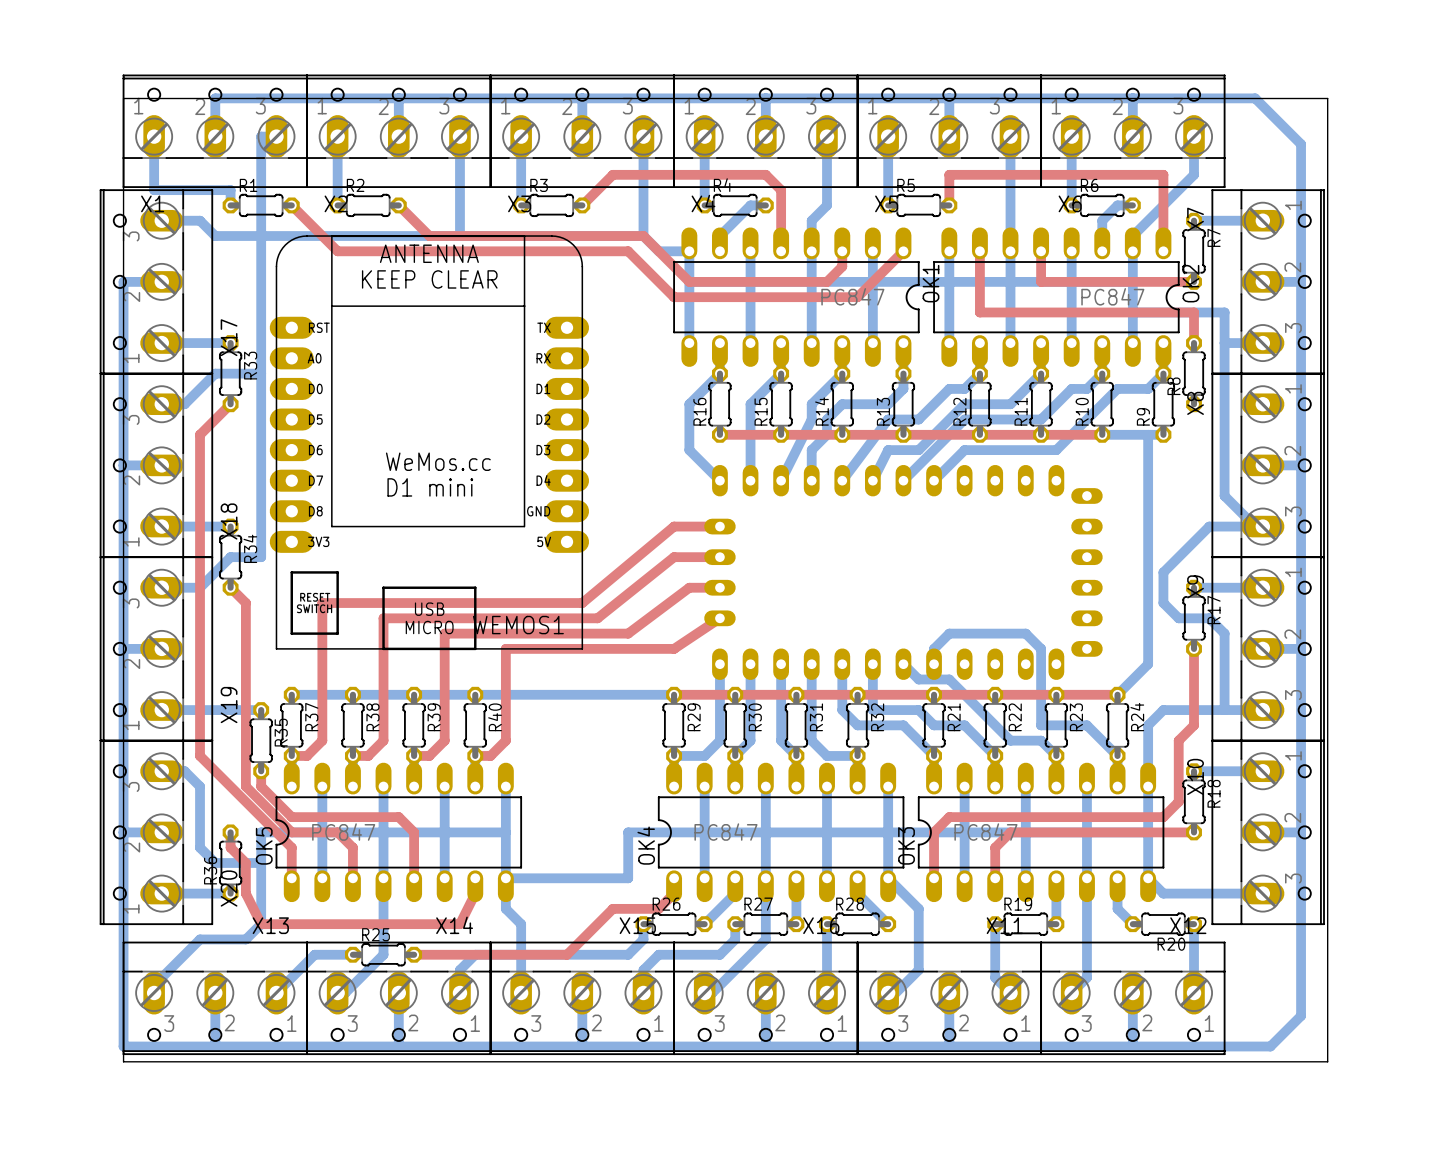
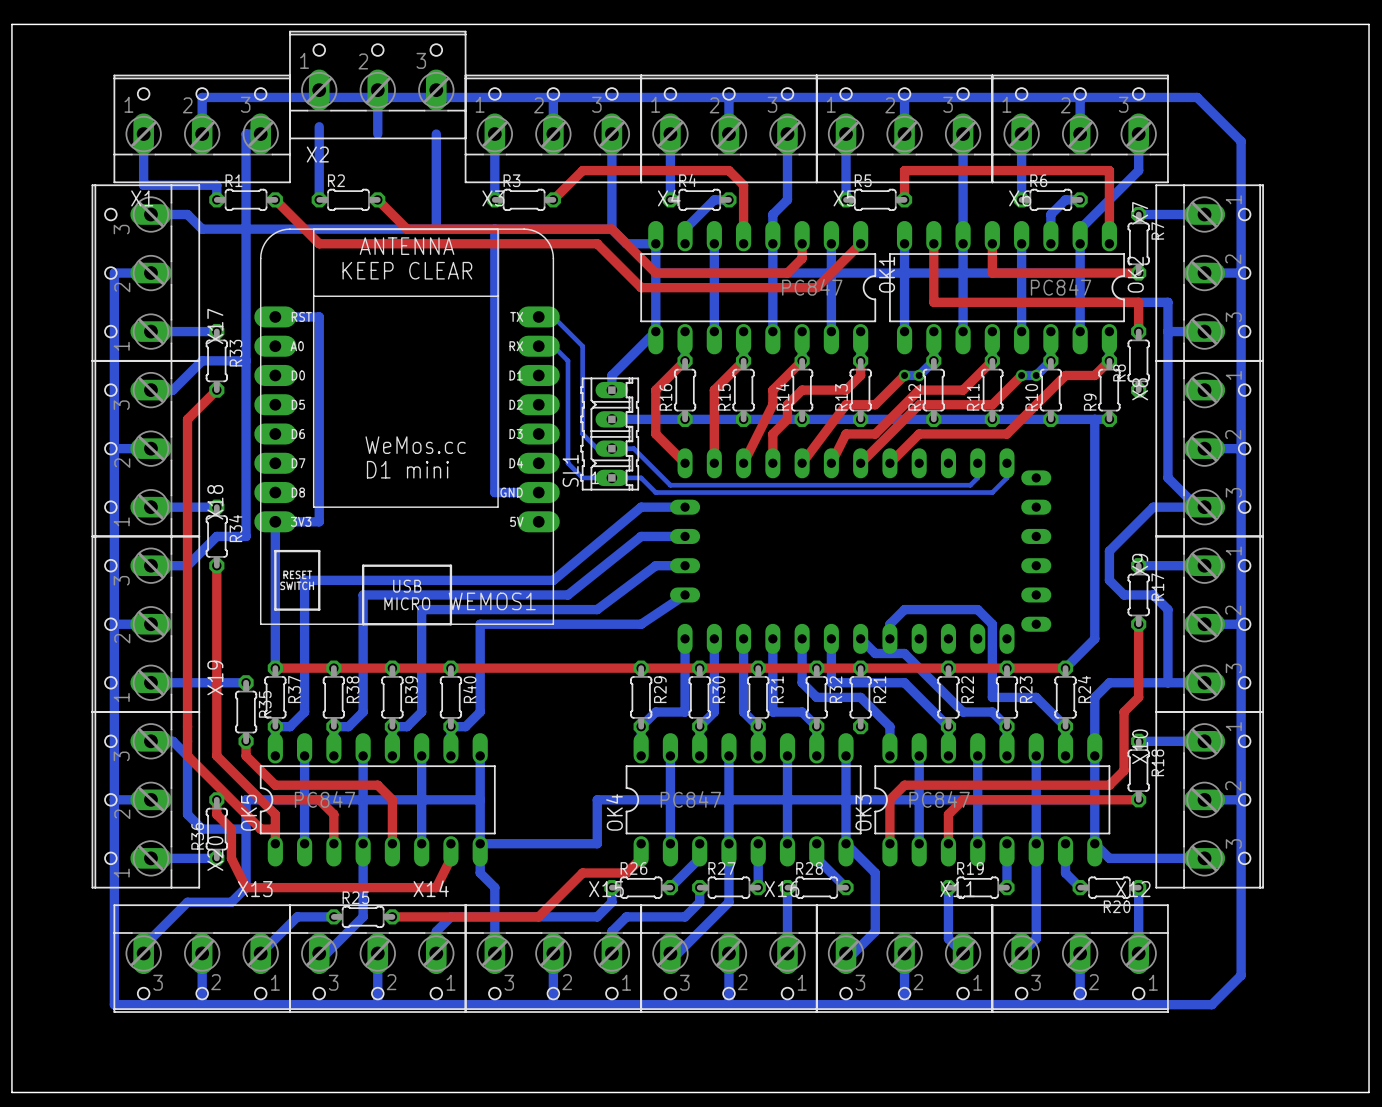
board edge: (123, 98) (1327, 98) (1327, 1061) (123, 1061) (123, 98) -> (11, 24) (11, 1092) (1369, 1092) (1369, 24) (11, 24)
X2 position: (398, 131) -> (377, 85)
bottom track: none -> (494, 229) (494, 492) (538, 492)
bottom track: none -> (538, 316) (553, 316) (582, 346) (582, 434) (597, 448) (633, 448) (670, 485) (970, 485) (977, 477) (977, 463)
bottom track: none -> (655, 331) (611, 375) (611, 390)
bottom track: none -> (538, 346) (553, 346) (568, 360) (568, 463) (582, 477) (641, 477) (655, 492) (992, 492) (1006, 477) (1006, 463)
top track: none -> (685, 360) (655, 390) (655, 434) (685, 463)
bottom track: (719, 373) (689, 404) (689, 450) (719, 480) -> none
top track: none -> (743, 360) (714, 390) (714, 463)
bottom track: (781, 373) (750, 404) (750, 480) -> none
top track: none -> (802, 360) (772, 390) (772, 404) (743, 463)
bottom track: (842, 373) (811, 404) (811, 419) (781, 480) -> none
top track: none -> (860, 360) (860, 375) (846, 390) (802, 390) (787, 404) (787, 419) (772, 434) (772, 463)
bottom track: (903, 373) (903, 388) (888, 404) (842, 404) (827, 419) (827, 434) (811, 450) (811, 480) -> none
top track: none -> (992, 360) (963, 390) (919, 390) (875, 434) (846, 434) (831, 463)
bottom track: (1041, 373) (1010, 404) (964, 404) (918, 450) (888, 450) (872, 480) -> none
top track: none -> (1109, 360) (1094, 375) (1065, 375) (1006, 434) (919, 434) (889, 463)
bottom track: (1163, 373) (1148, 388) (1117, 388) (1056, 450) (964, 450) (934, 480) -> none
top track: none -> (904, 375) (875, 404) (846, 404) (802, 463)
bottom track: (949, 388) (918, 419) (888, 419) (842, 480) -> none
via: none -> (904, 375)
via: none -> (919, 375)
top track: none -> (1021, 375) (992, 404) (919, 404) (860, 463)
bottom track: (1071, 388) (1041, 419) (964, 419) (903, 480) -> none
via: none -> (1021, 375)
via: none -> (1036, 375)
bottom track: none -> (611, 419) (1050, 419)
top track: (719, 434) (1102, 434) -> none
SL1: none -> (609, 434)
top track: (719, 526) (674, 526) (582, 603) (322, 603) (322, 740) (307, 755) (291, 755) -> none
bottom track: none -> (685, 507) (641, 507) (553, 580) (304, 580) (304, 712) (289, 726) (275, 726)
top track: (719, 557) (674, 557) (597, 618) (383, 618) (383, 740) (368, 755) (352, 755) -> none
bottom track: none -> (685, 536) (641, 536) (568, 594) (363, 594) (363, 712) (348, 726) (333, 726)
top track: (230, 587) (245, 603) (245, 786) (291, 832) -> (216, 565) (216, 755)
top track: (719, 587) (689, 587) (628, 633) (444, 633) (444, 740) (429, 755) (414, 755) -> none
bottom track: none -> (685, 565) (655, 565) (597, 609) (421, 609) (421, 712) (407, 726) (392, 726)
top track: (719, 618) (674, 648) (505, 648) (505, 740) (490, 755) (475, 755) -> none
bottom track: none -> (685, 594) (641, 624) (480, 624) (480, 712) (465, 726) (450, 726)
top track: none -> (275, 668) (641, 668)
bottom track: (291, 694) (674, 694) -> (275, 668) (275, 521) (319, 521) (319, 316) (275, 316)
bottom track: (918, 710) (934, 725) (964, 725) -> (875, 682) (904, 682) (919, 697)
R21 position: (934, 725) -> (860, 697)
bottom track: (719, 740) (704, 755) (674, 755) -> (685, 712) (655, 712) (641, 726)
bottom track: (811, 740) (827, 755) (857, 755) -> (772, 712) (802, 712) (816, 726)
top track: (200, 755) (230, 786) -> (187, 726) (187, 755) (260, 829) (275, 829)

